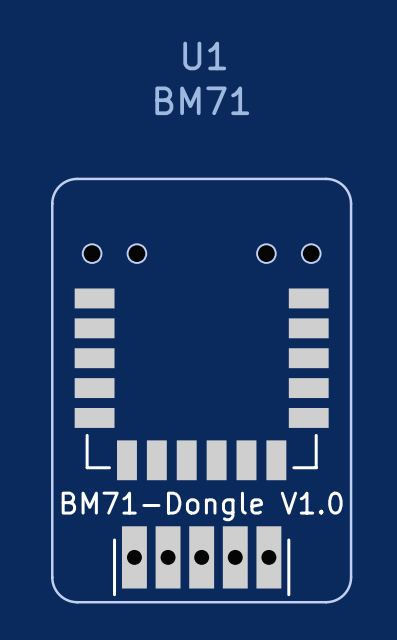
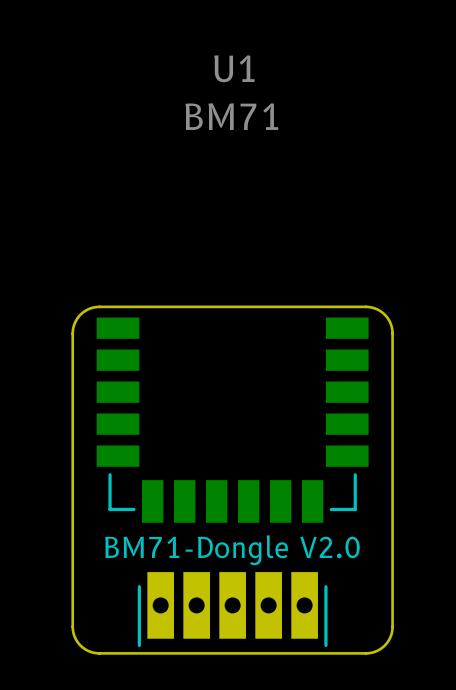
part: (114, 253) -> none
part: (288, 253) -> none
board edge: (351, 303) (350, 198) (341, 184) (326, 178) (77, 178) (66, 181) (56, 190) (52, 201) (52, 303) -> (392, 333) (389, 321) (384, 314) (374, 308) (365, 306) (96, 307) (85, 310) (78, 316) (72, 333)
text: BM71-Dongle V1.0 (202, 506) -> BM71-Dongle V2.0 (232, 550)

